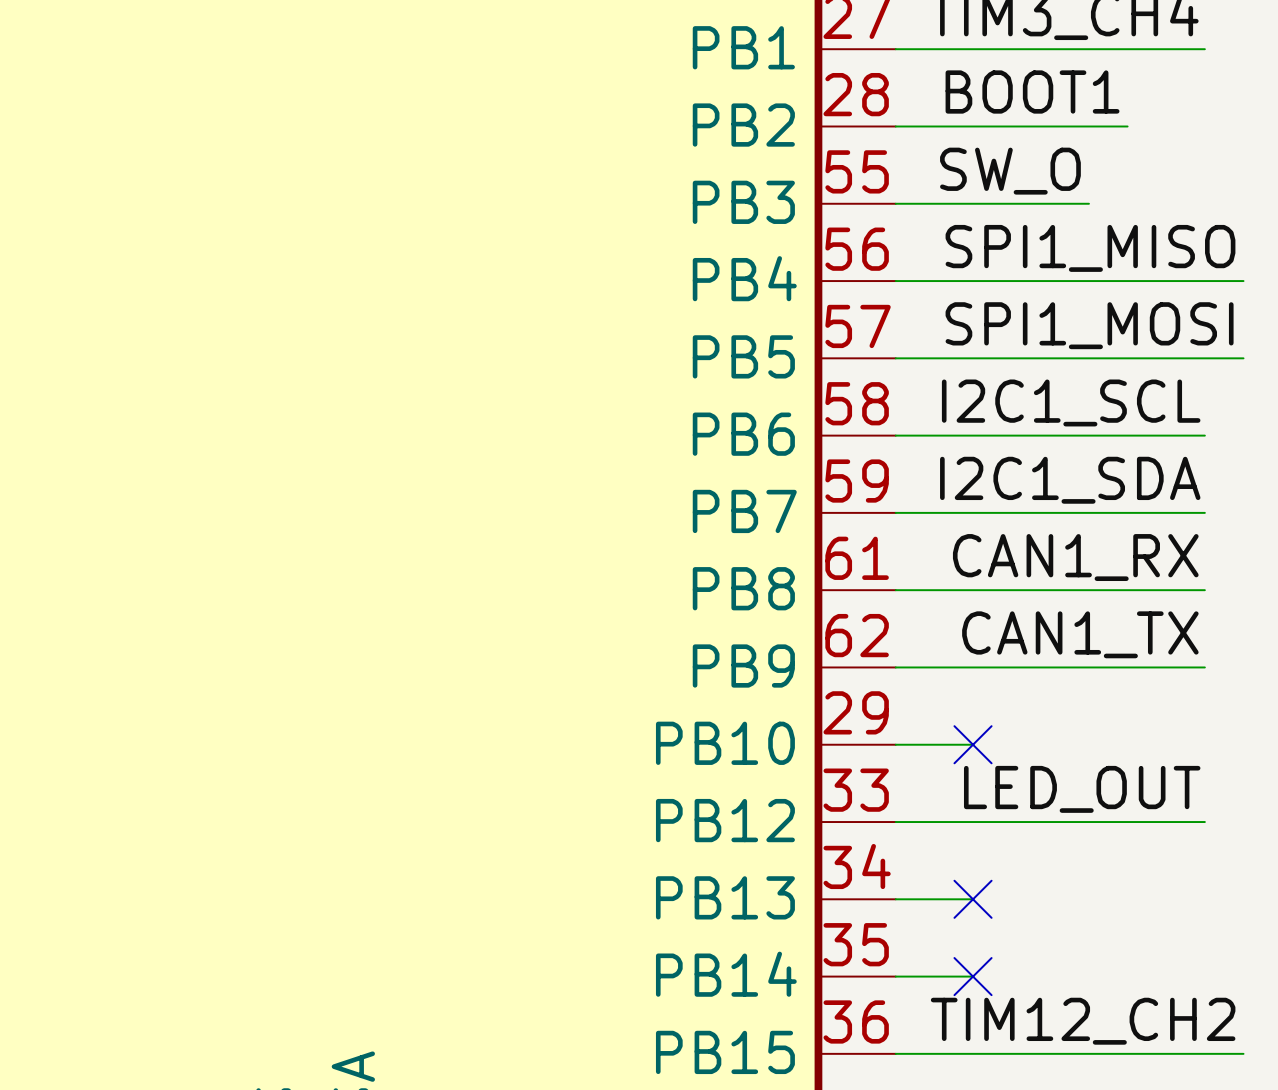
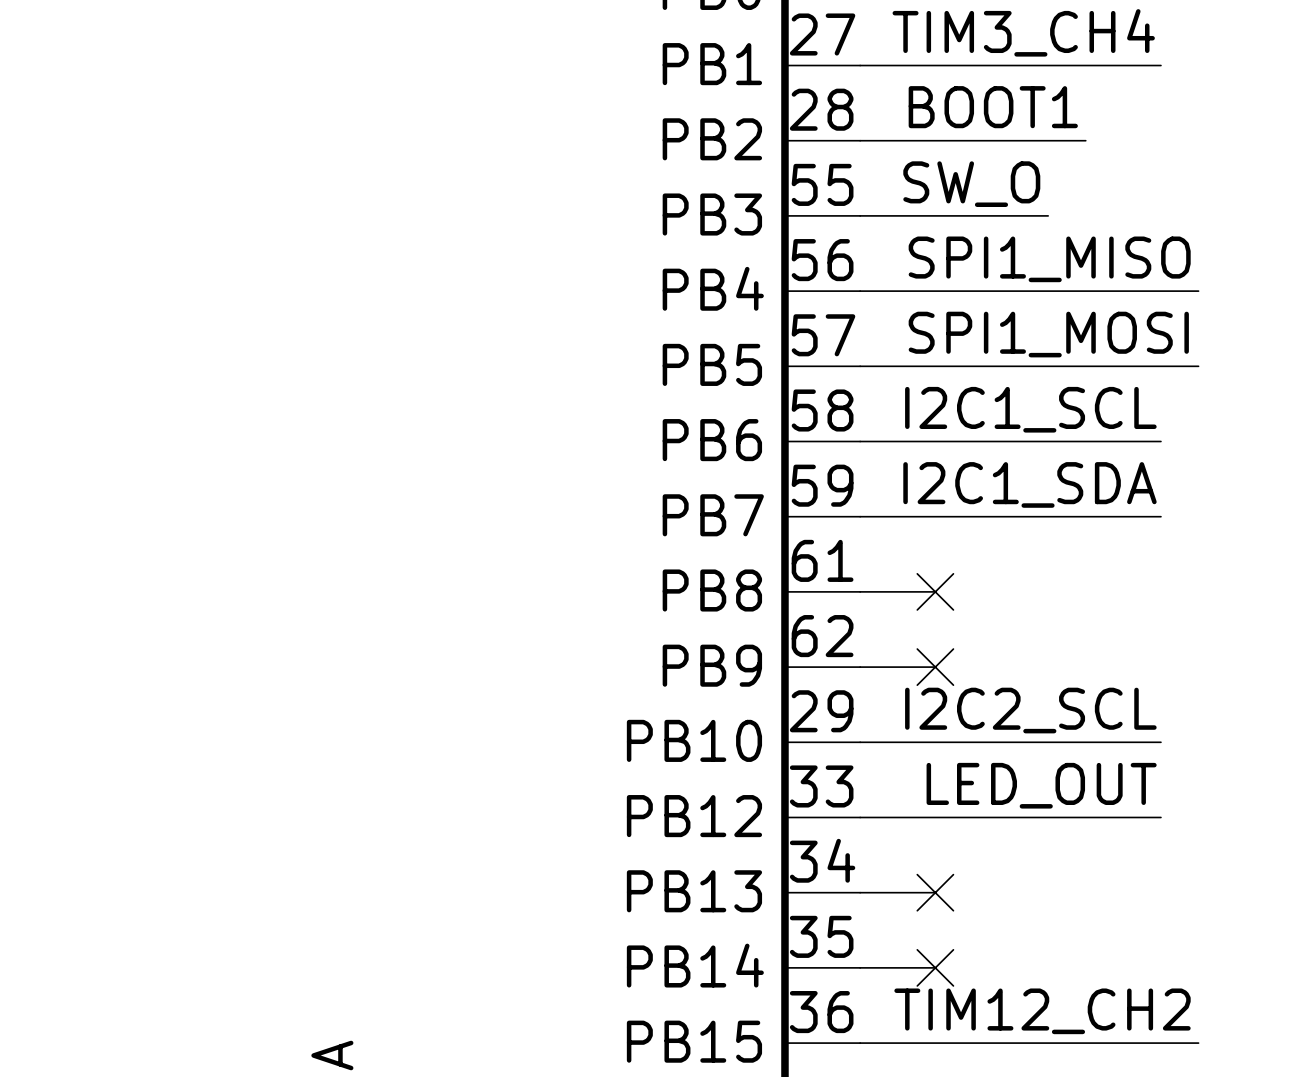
label: CAN1_RX (1075, 557) -> none
wire: (973, 590) (1204, 590) -> none
no-connect mark: none -> (935, 591)
label: CAN1_TX (1080, 634) -> none
wire: (973, 667) (1204, 667) -> (935, 742) (1160, 742)
no-connect mark: none -> (935, 667)
label: none -> I2C2_SCL (1030, 710)
no-connect mark: (973, 744) -> none

